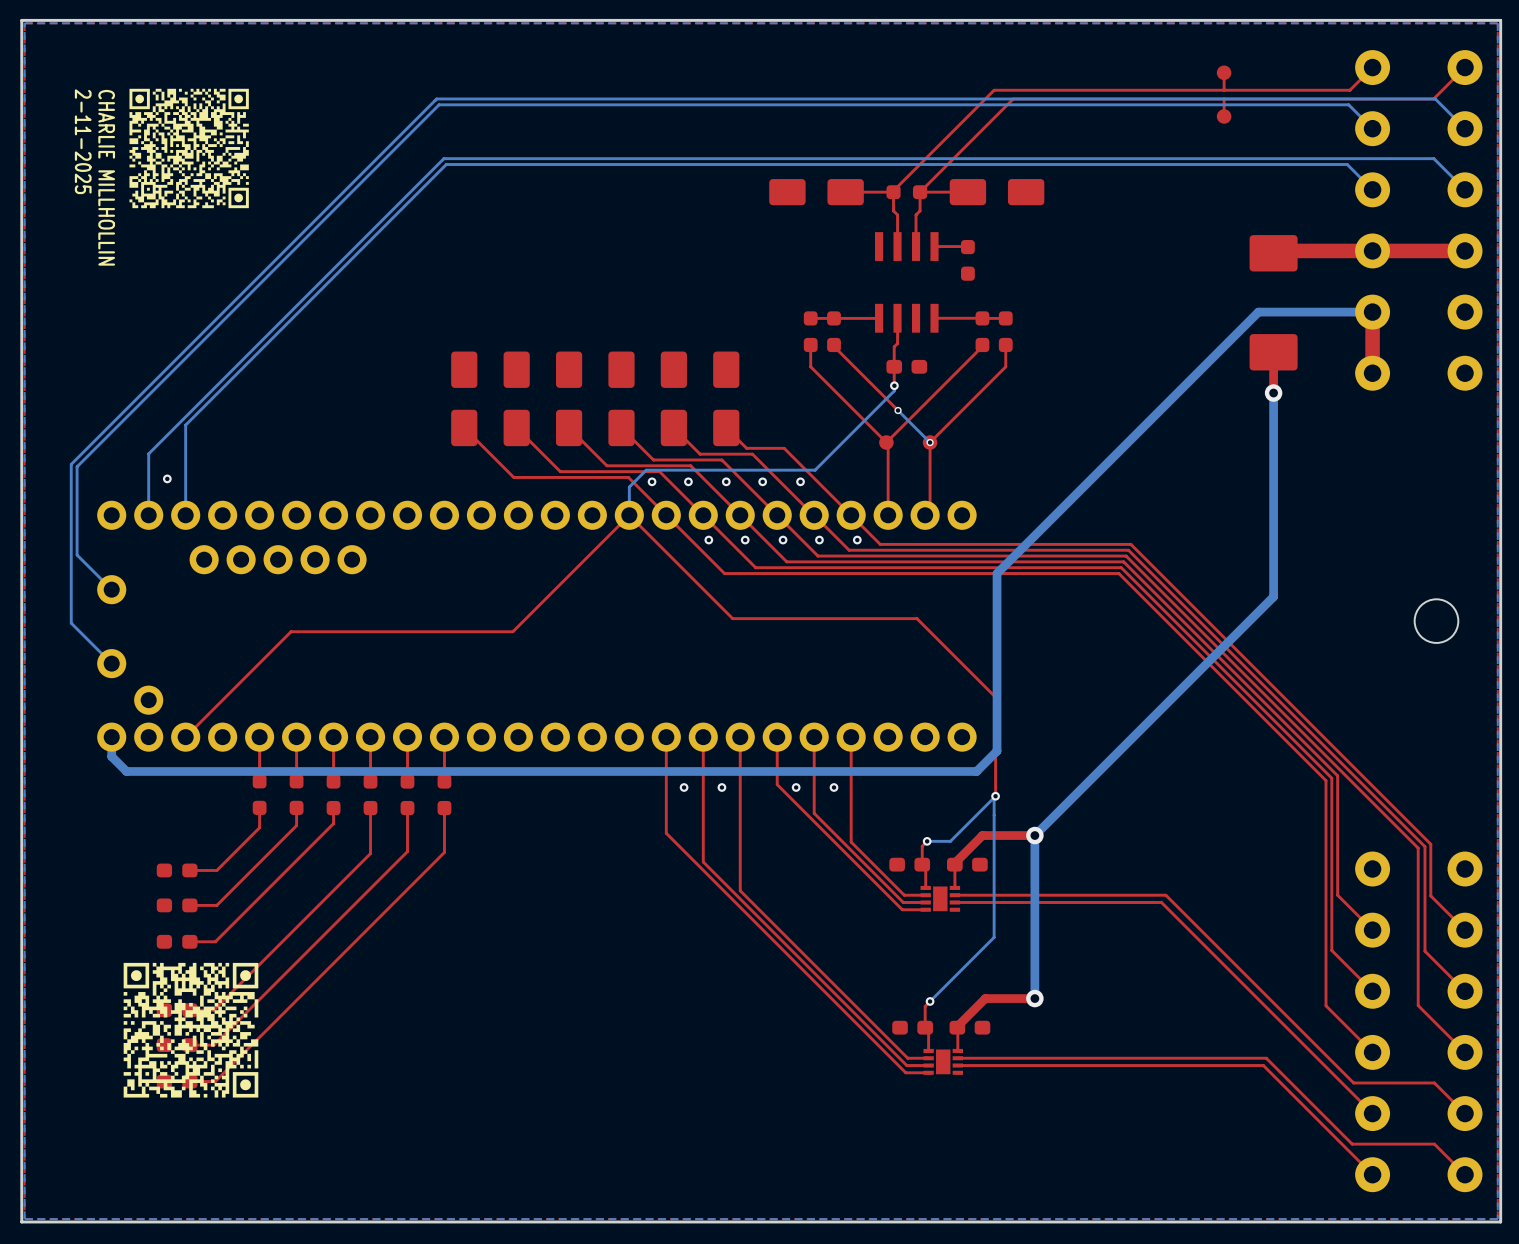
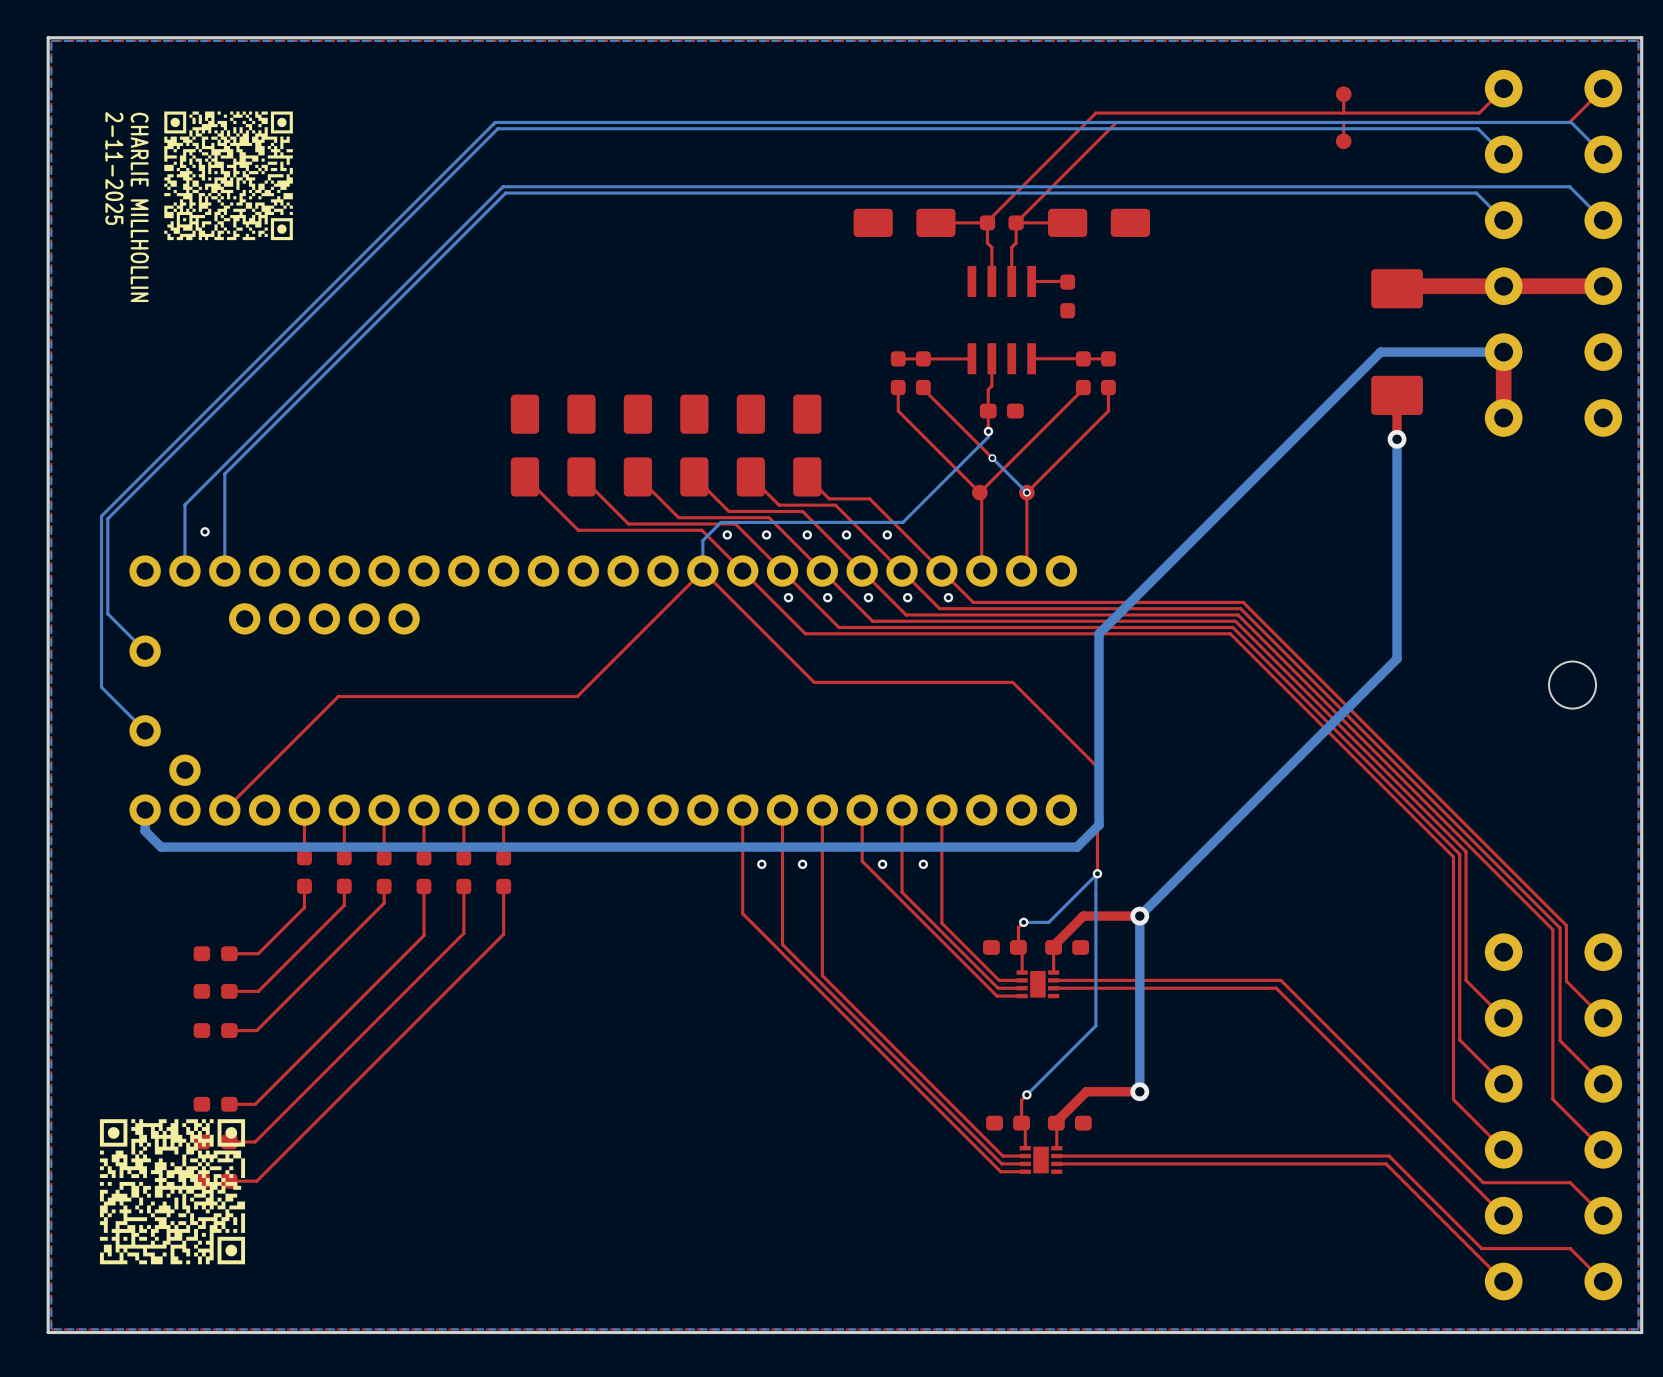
drawing position: (190, 1030) -> (172, 1191)

